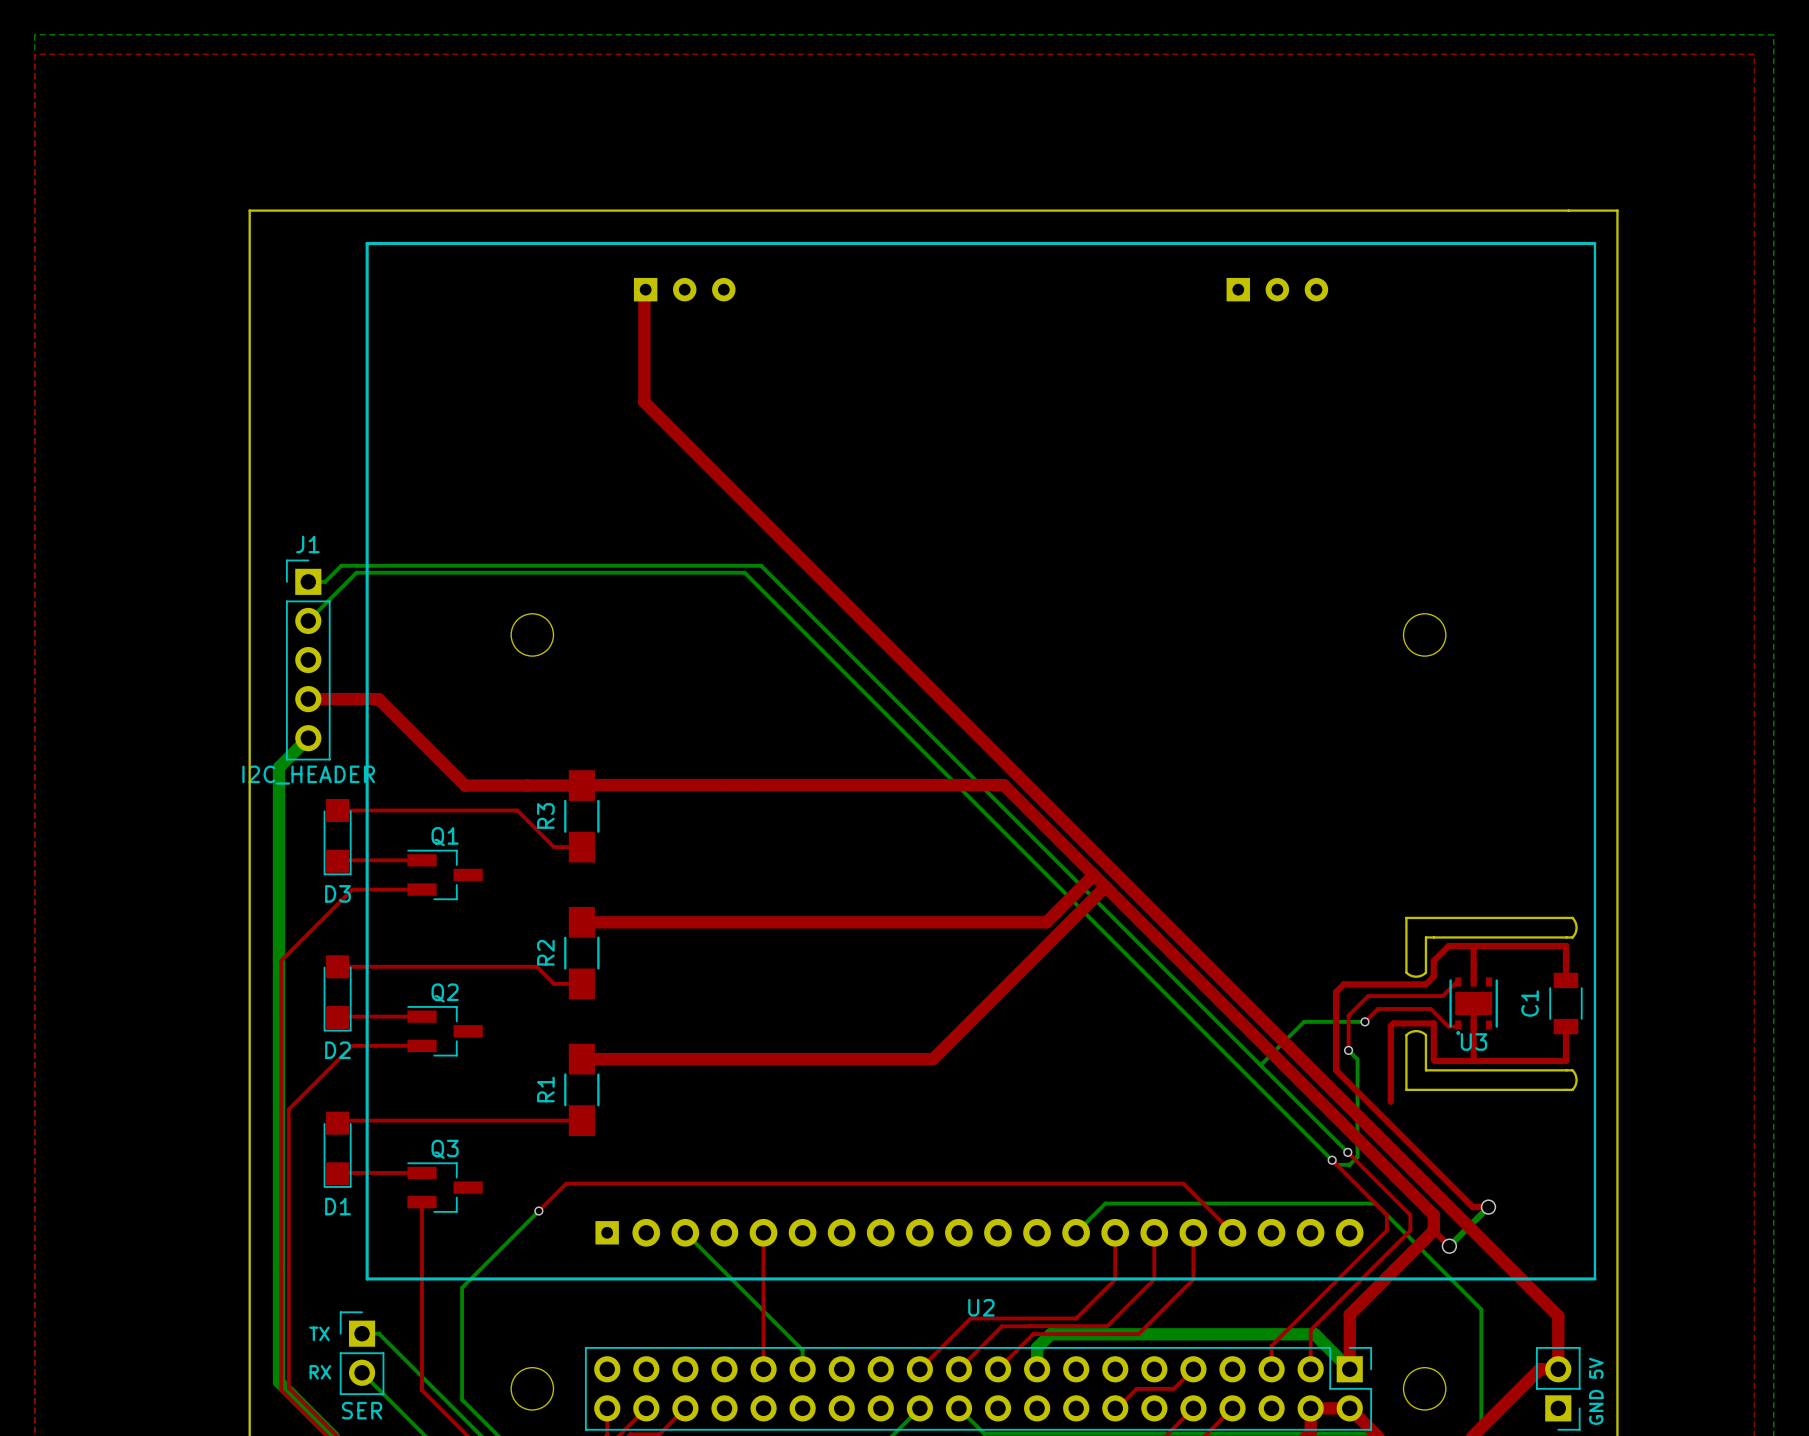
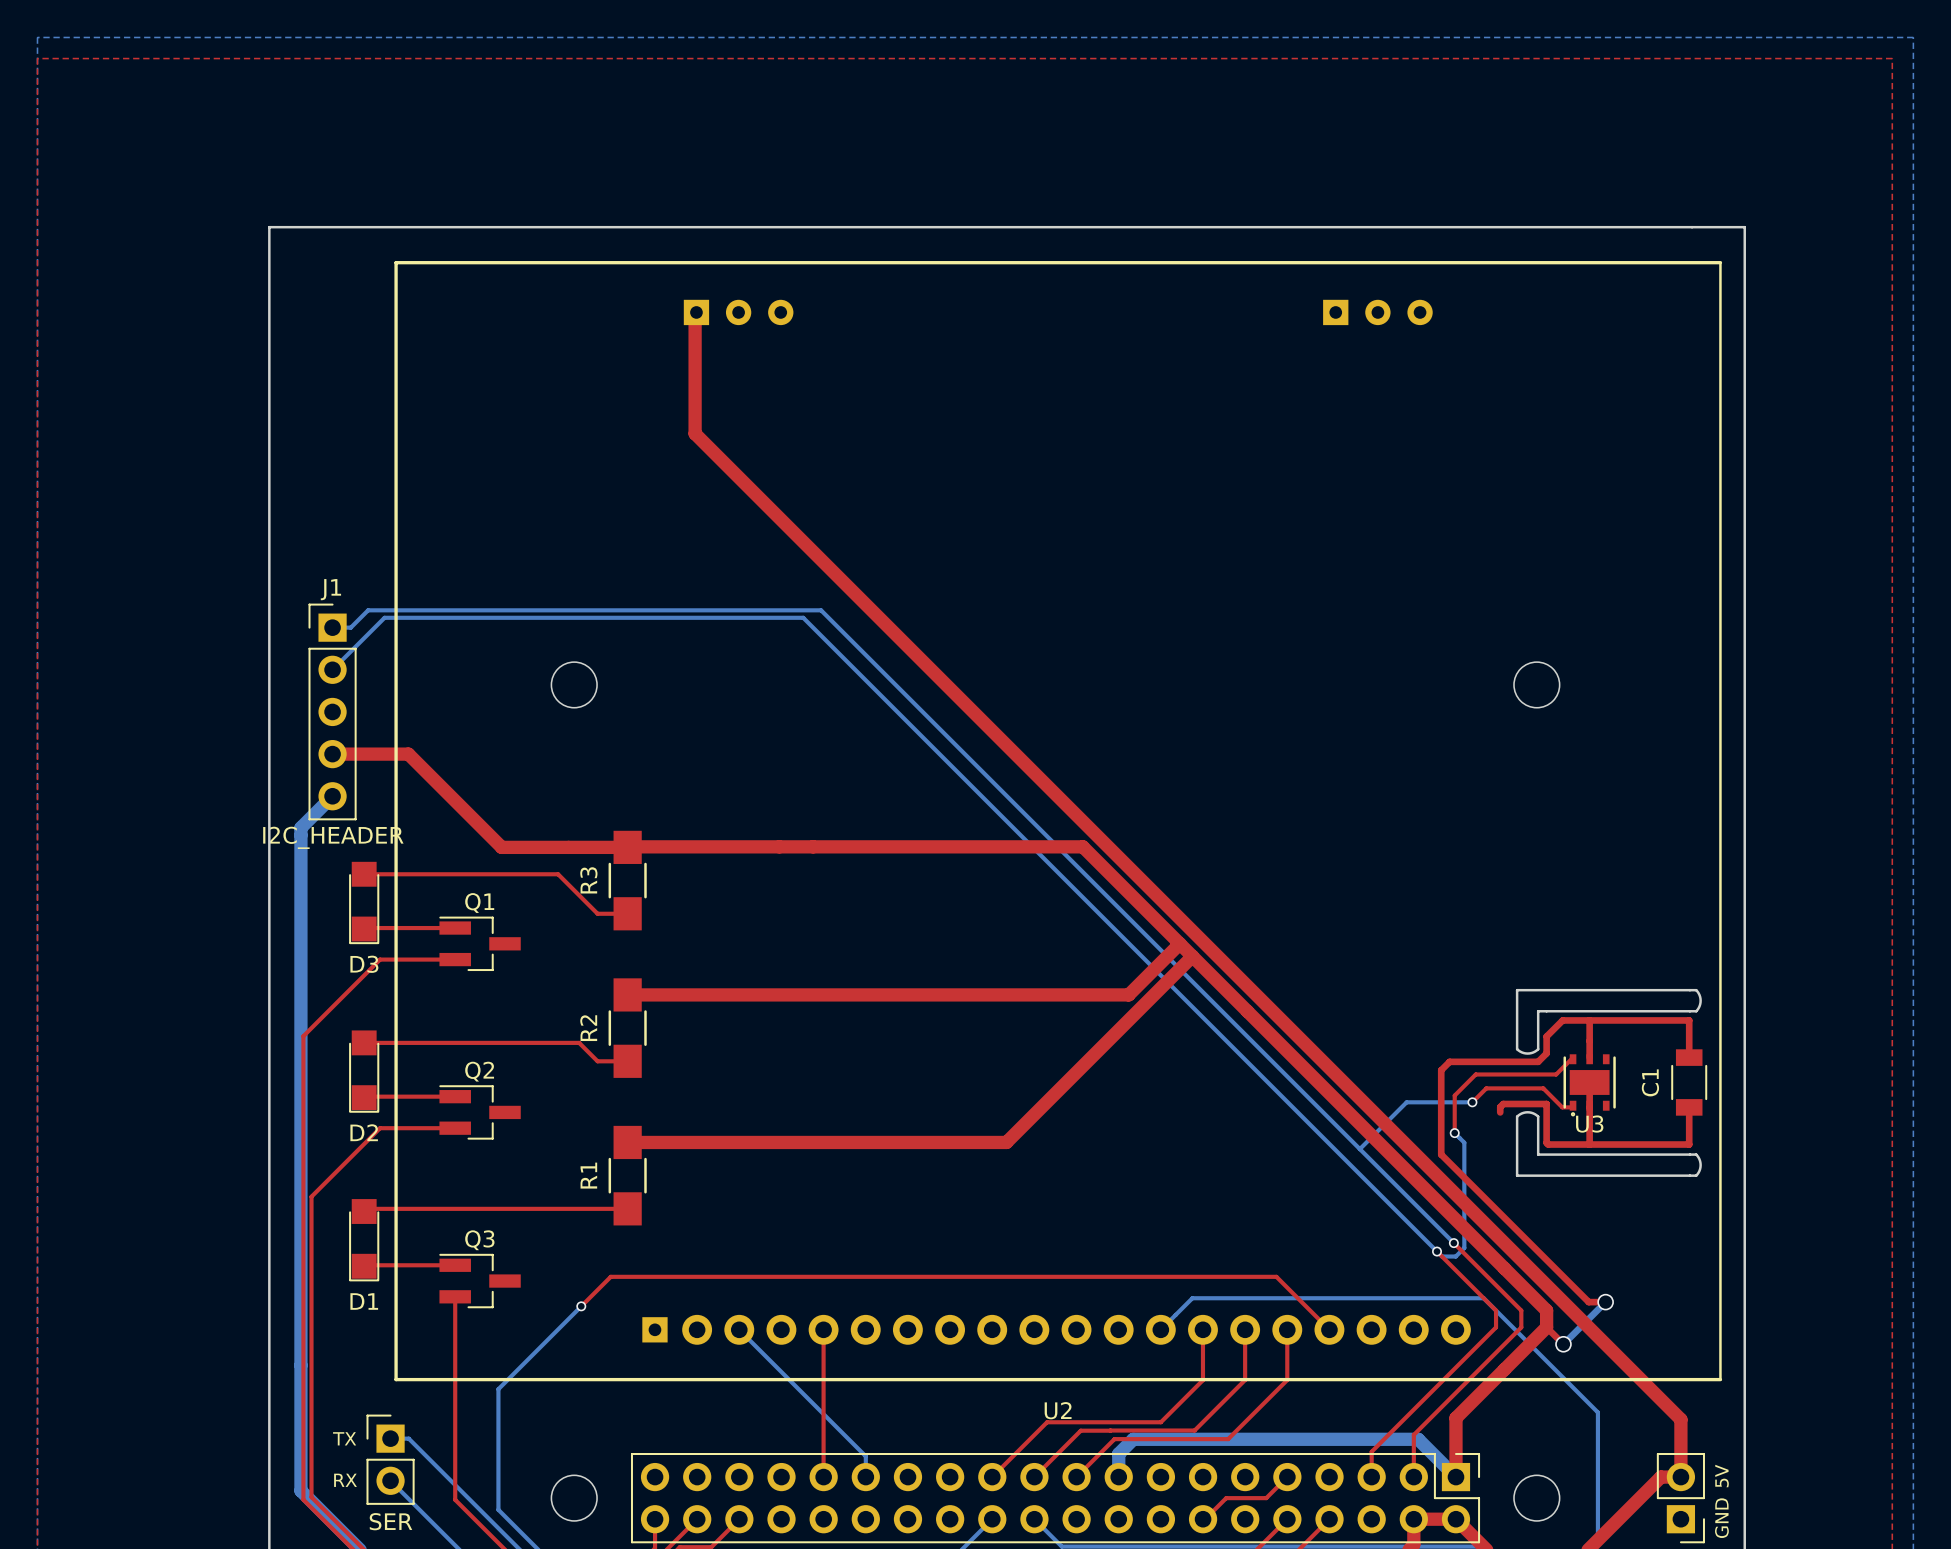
top track: (1390, 1031) (1390, 1101) -> none

